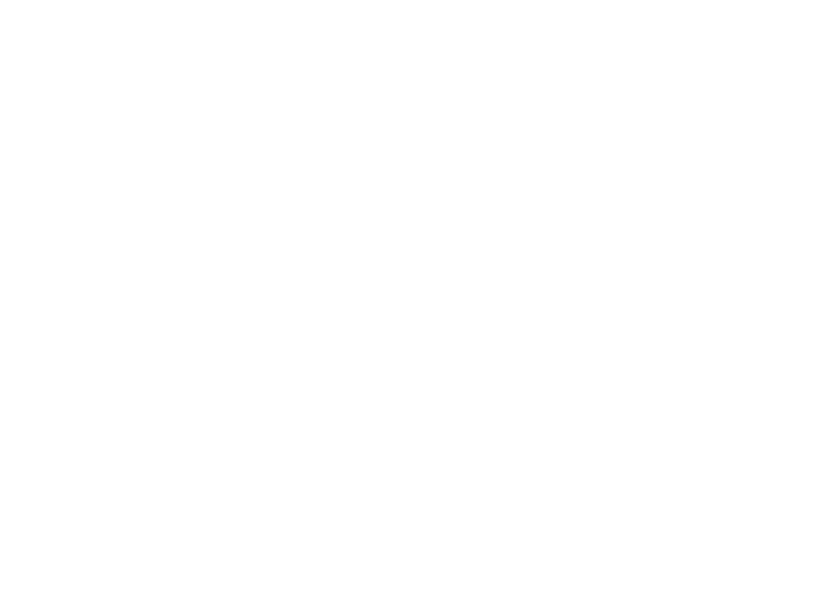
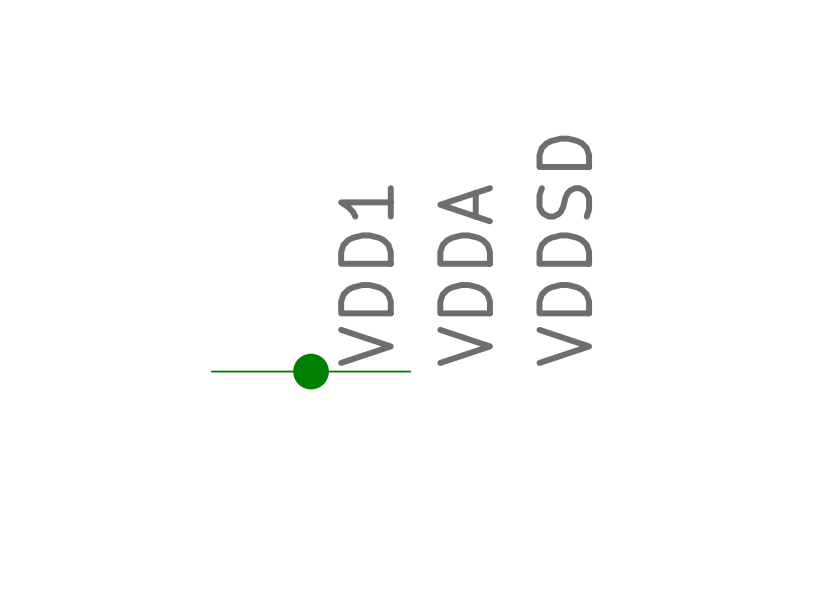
label: none -> VDDSD (564, 250)
label: none -> VDD1 (365, 275)
label: none -> VDDA (465, 275)
wire: none -> (211, 371) (410, 371)
junction: none -> (311, 371)

